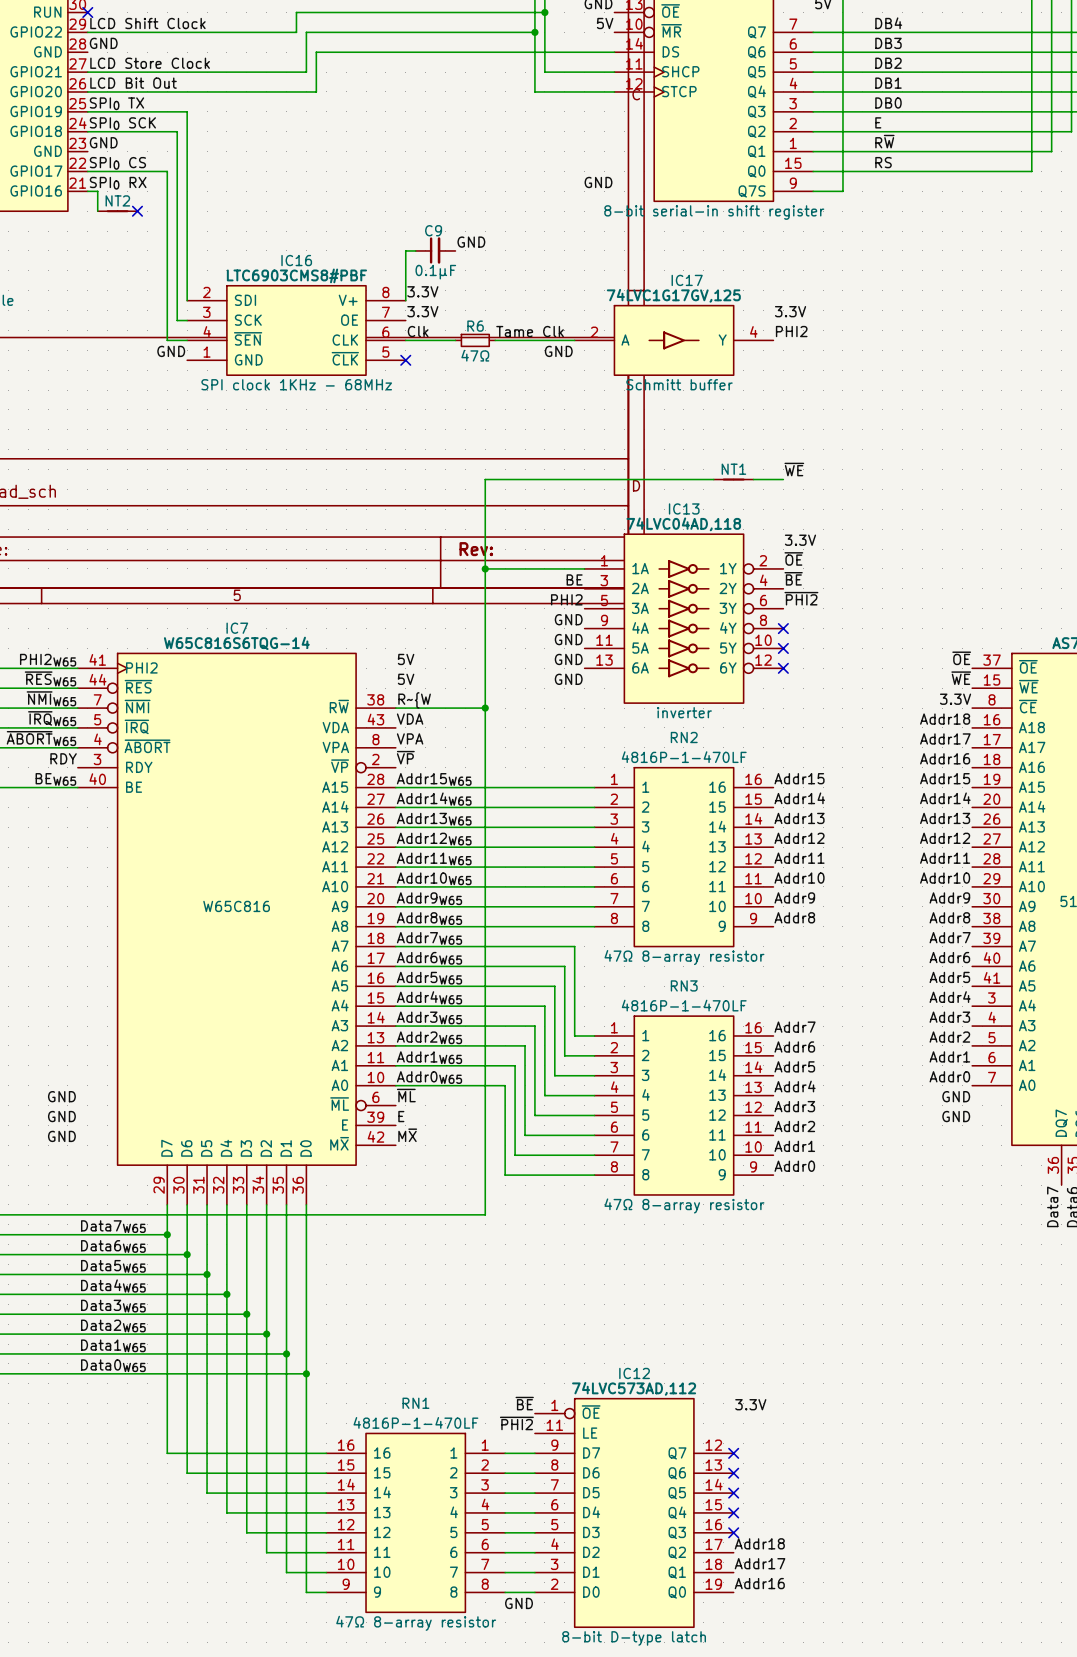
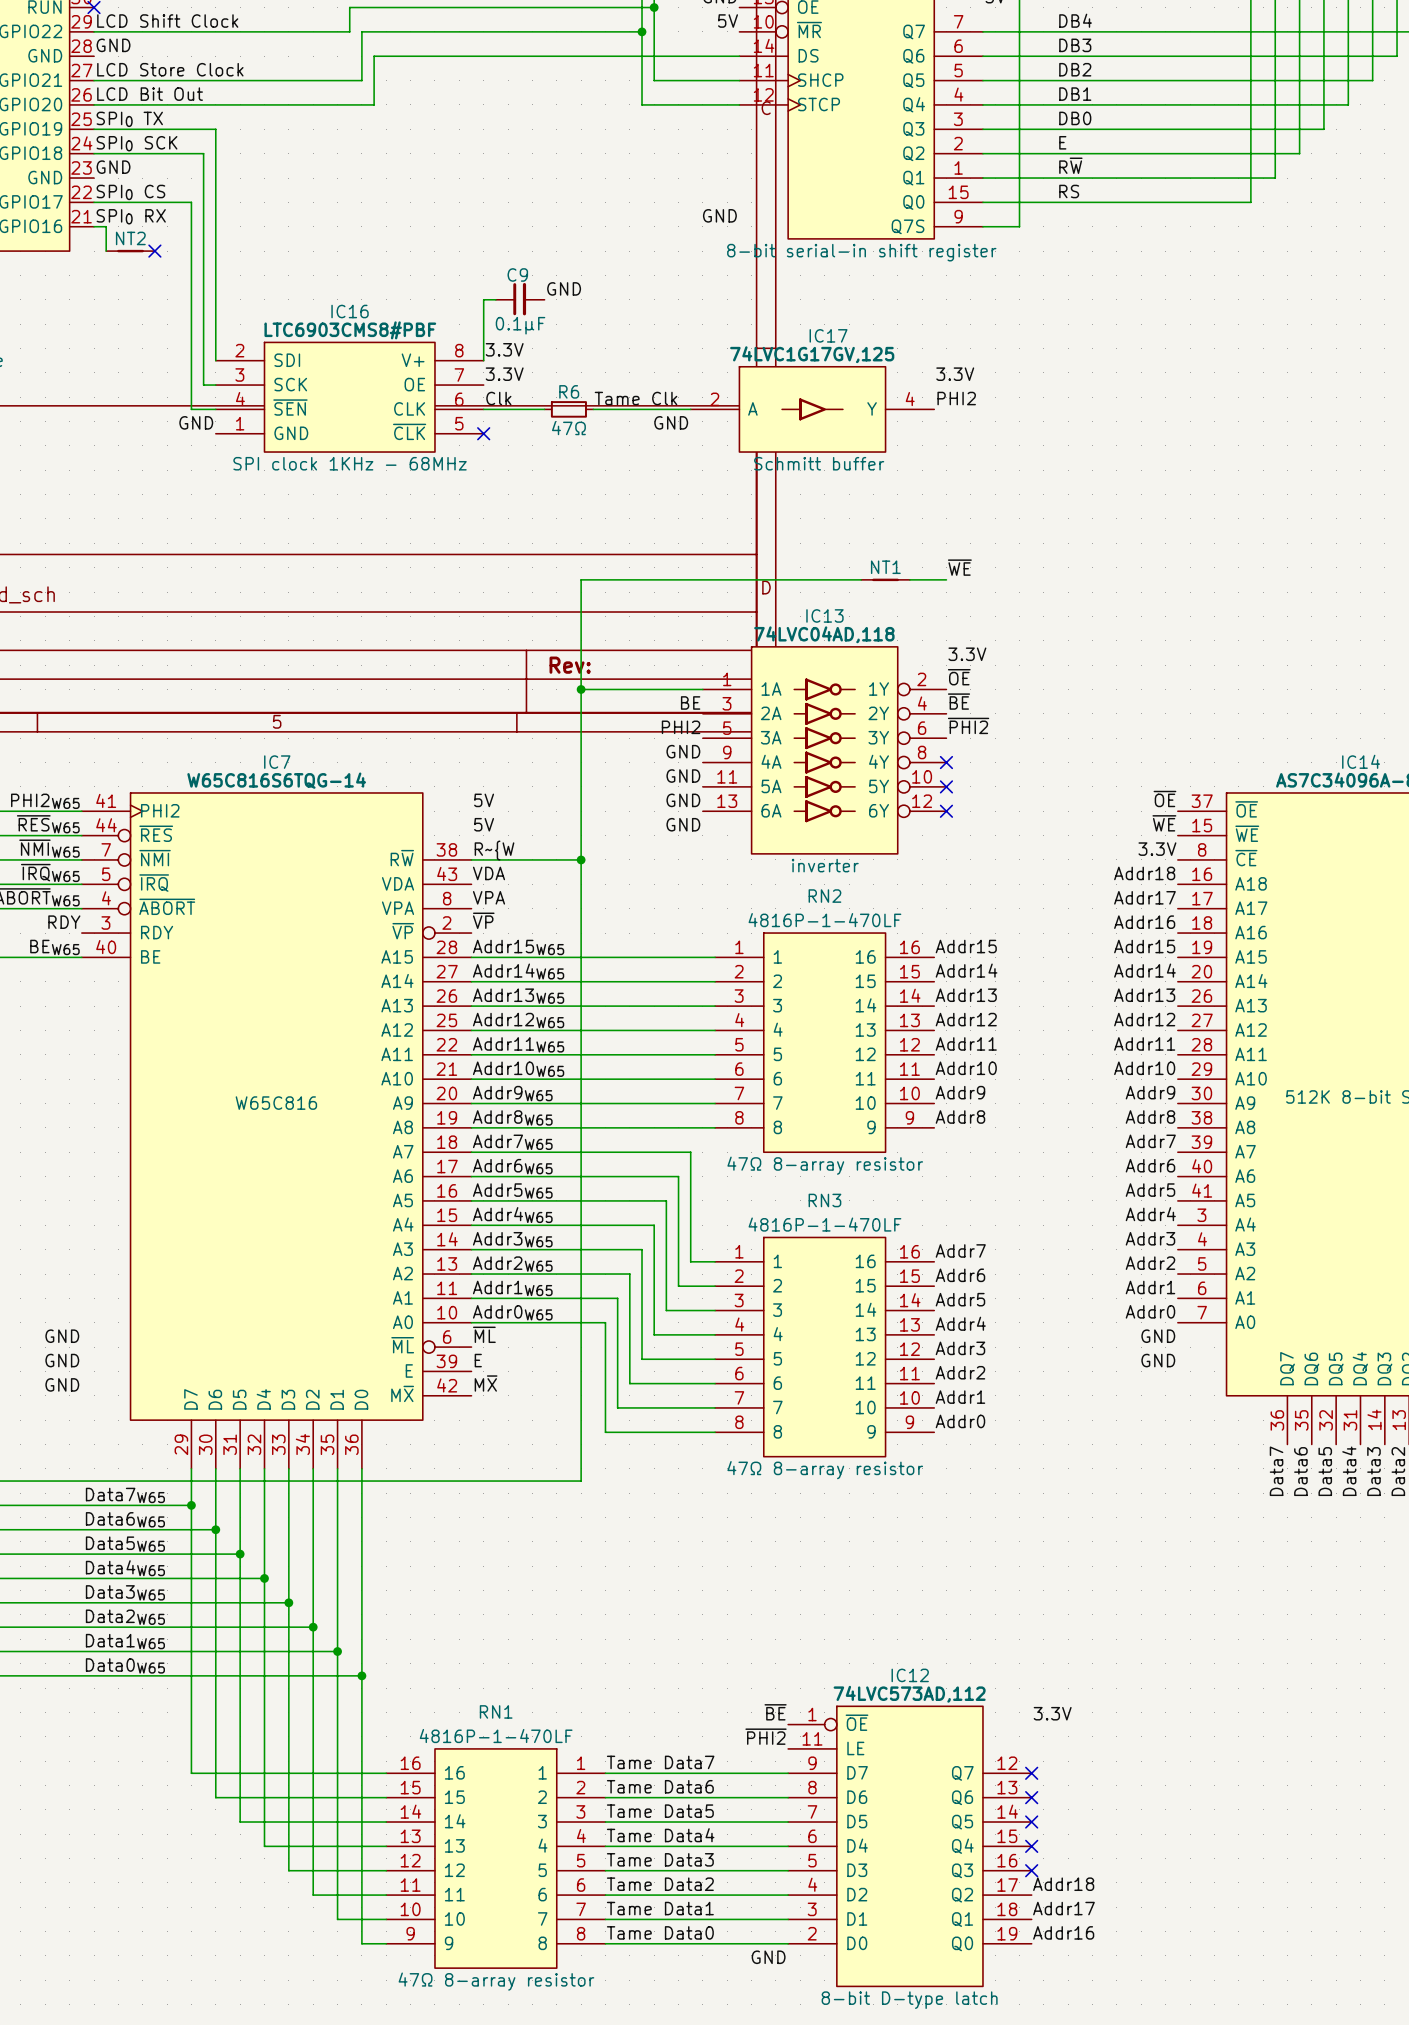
label position: ~{BE} (524, 1403) -> ~{BE} (775, 1712)
label position: 3.3V (750, 1404) -> 3.3V (1052, 1713)
label position: ~{PHI2} (516, 1423) -> ~{PHI2} (766, 1736)
label: none -> Tame Data7 (660, 1762)
no-connect mark: (733, 1453) -> none
no-connect mark: none -> (1031, 1773)
label: none -> Tame Data6 (660, 1786)
no-connect mark: (733, 1473) -> none
no-connect mark: none -> (1031, 1797)
label: none -> Tame Data5 (660, 1811)
no-connect mark: (733, 1493) -> none
no-connect mark: none -> (1031, 1822)
label: none -> Tame Data4 (660, 1835)
IC12 position: (634, 1512) -> (909, 1846)
no-connect mark: (733, 1512) -> none
no-connect mark: none -> (1031, 1846)
label: none -> Tame Data3 (660, 1859)
no-connect mark: (733, 1532) -> none
no-connect mark: none -> (1031, 1870)
label: none -> Tame Data2 (660, 1884)
label position: Addr18 (759, 1543) -> Addr18 (1063, 1884)
label: none -> Tame Data1 (660, 1908)
label position: Addr17 (760, 1563) -> Addr17 (1063, 1908)
label: none -> Tame Data0 (660, 1932)
label position: Addr16 (759, 1583) -> Addr16 (1063, 1932)
label position: GND (519, 1603) -> GND (768, 1957)

